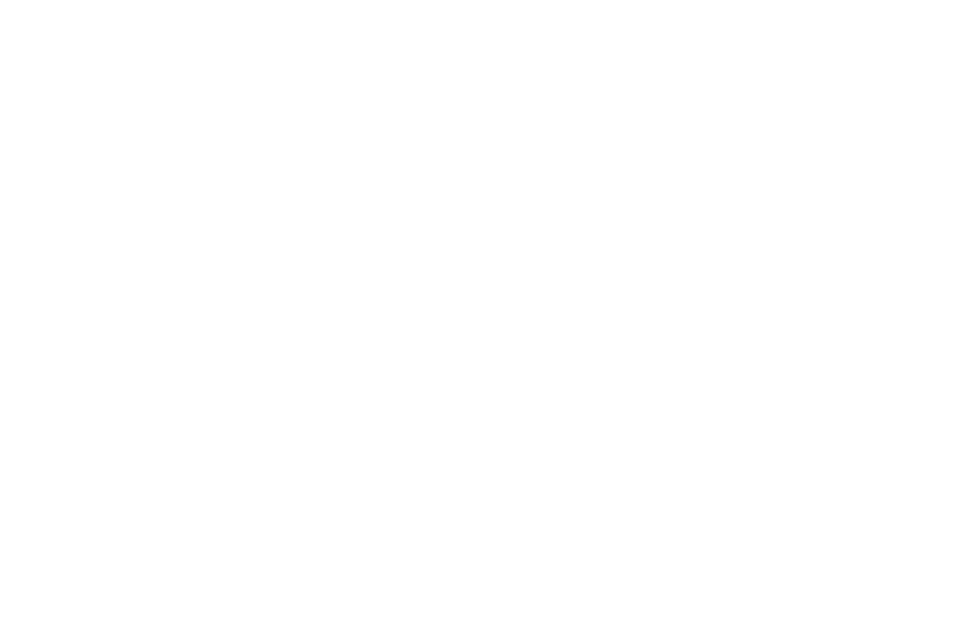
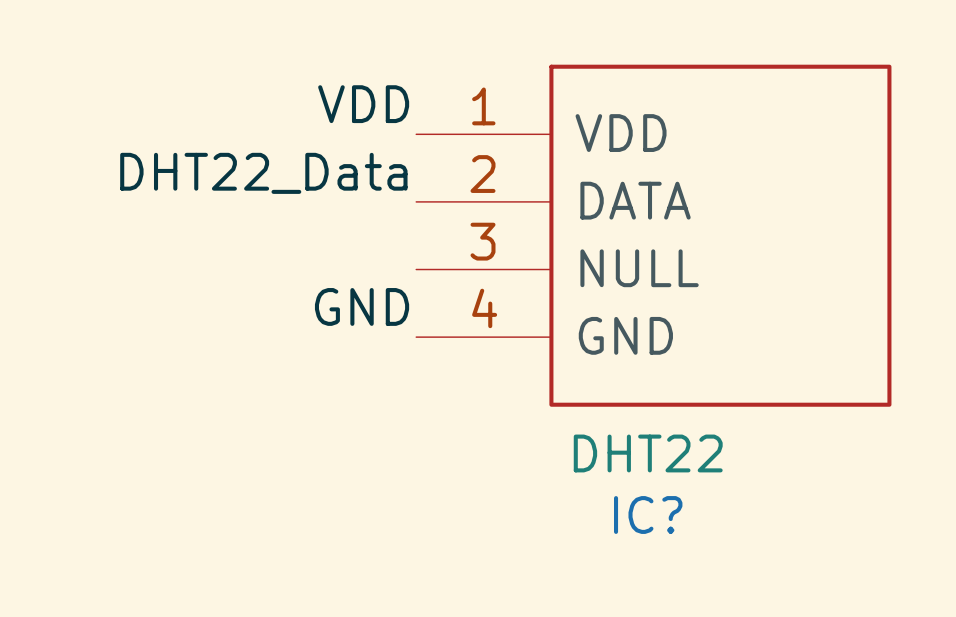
label: none -> VDD (363, 104)
label: none -> DHT22_Data (263, 173)
IC?: none -> DHT22 (653, 235)
label: none -> GND (362, 306)

